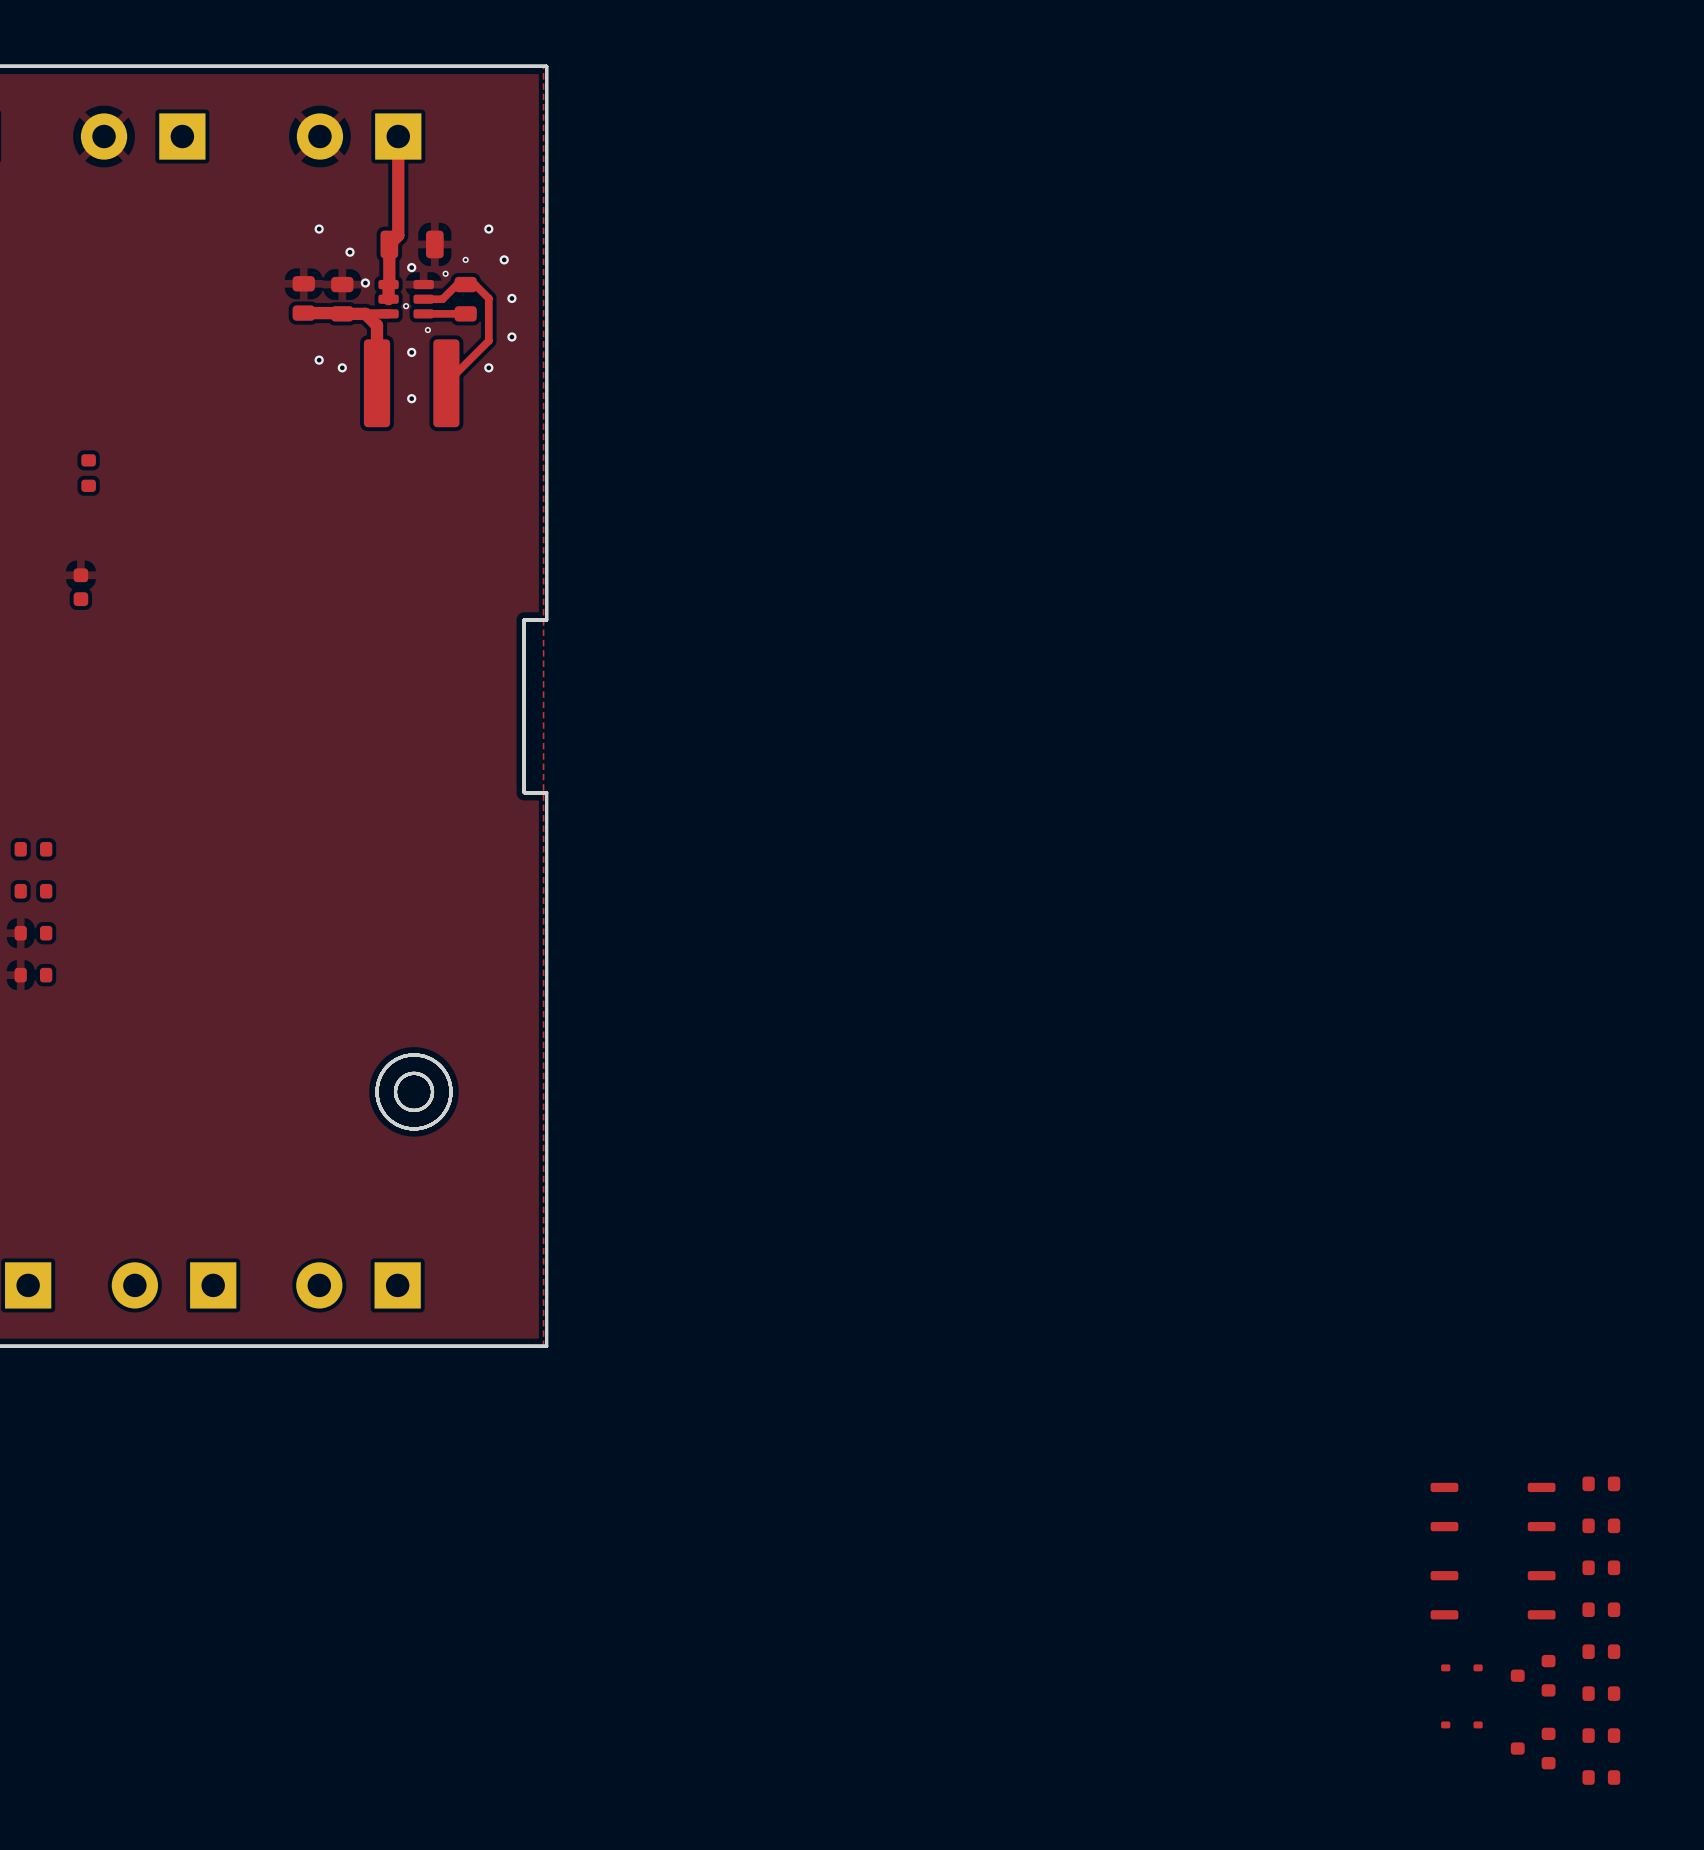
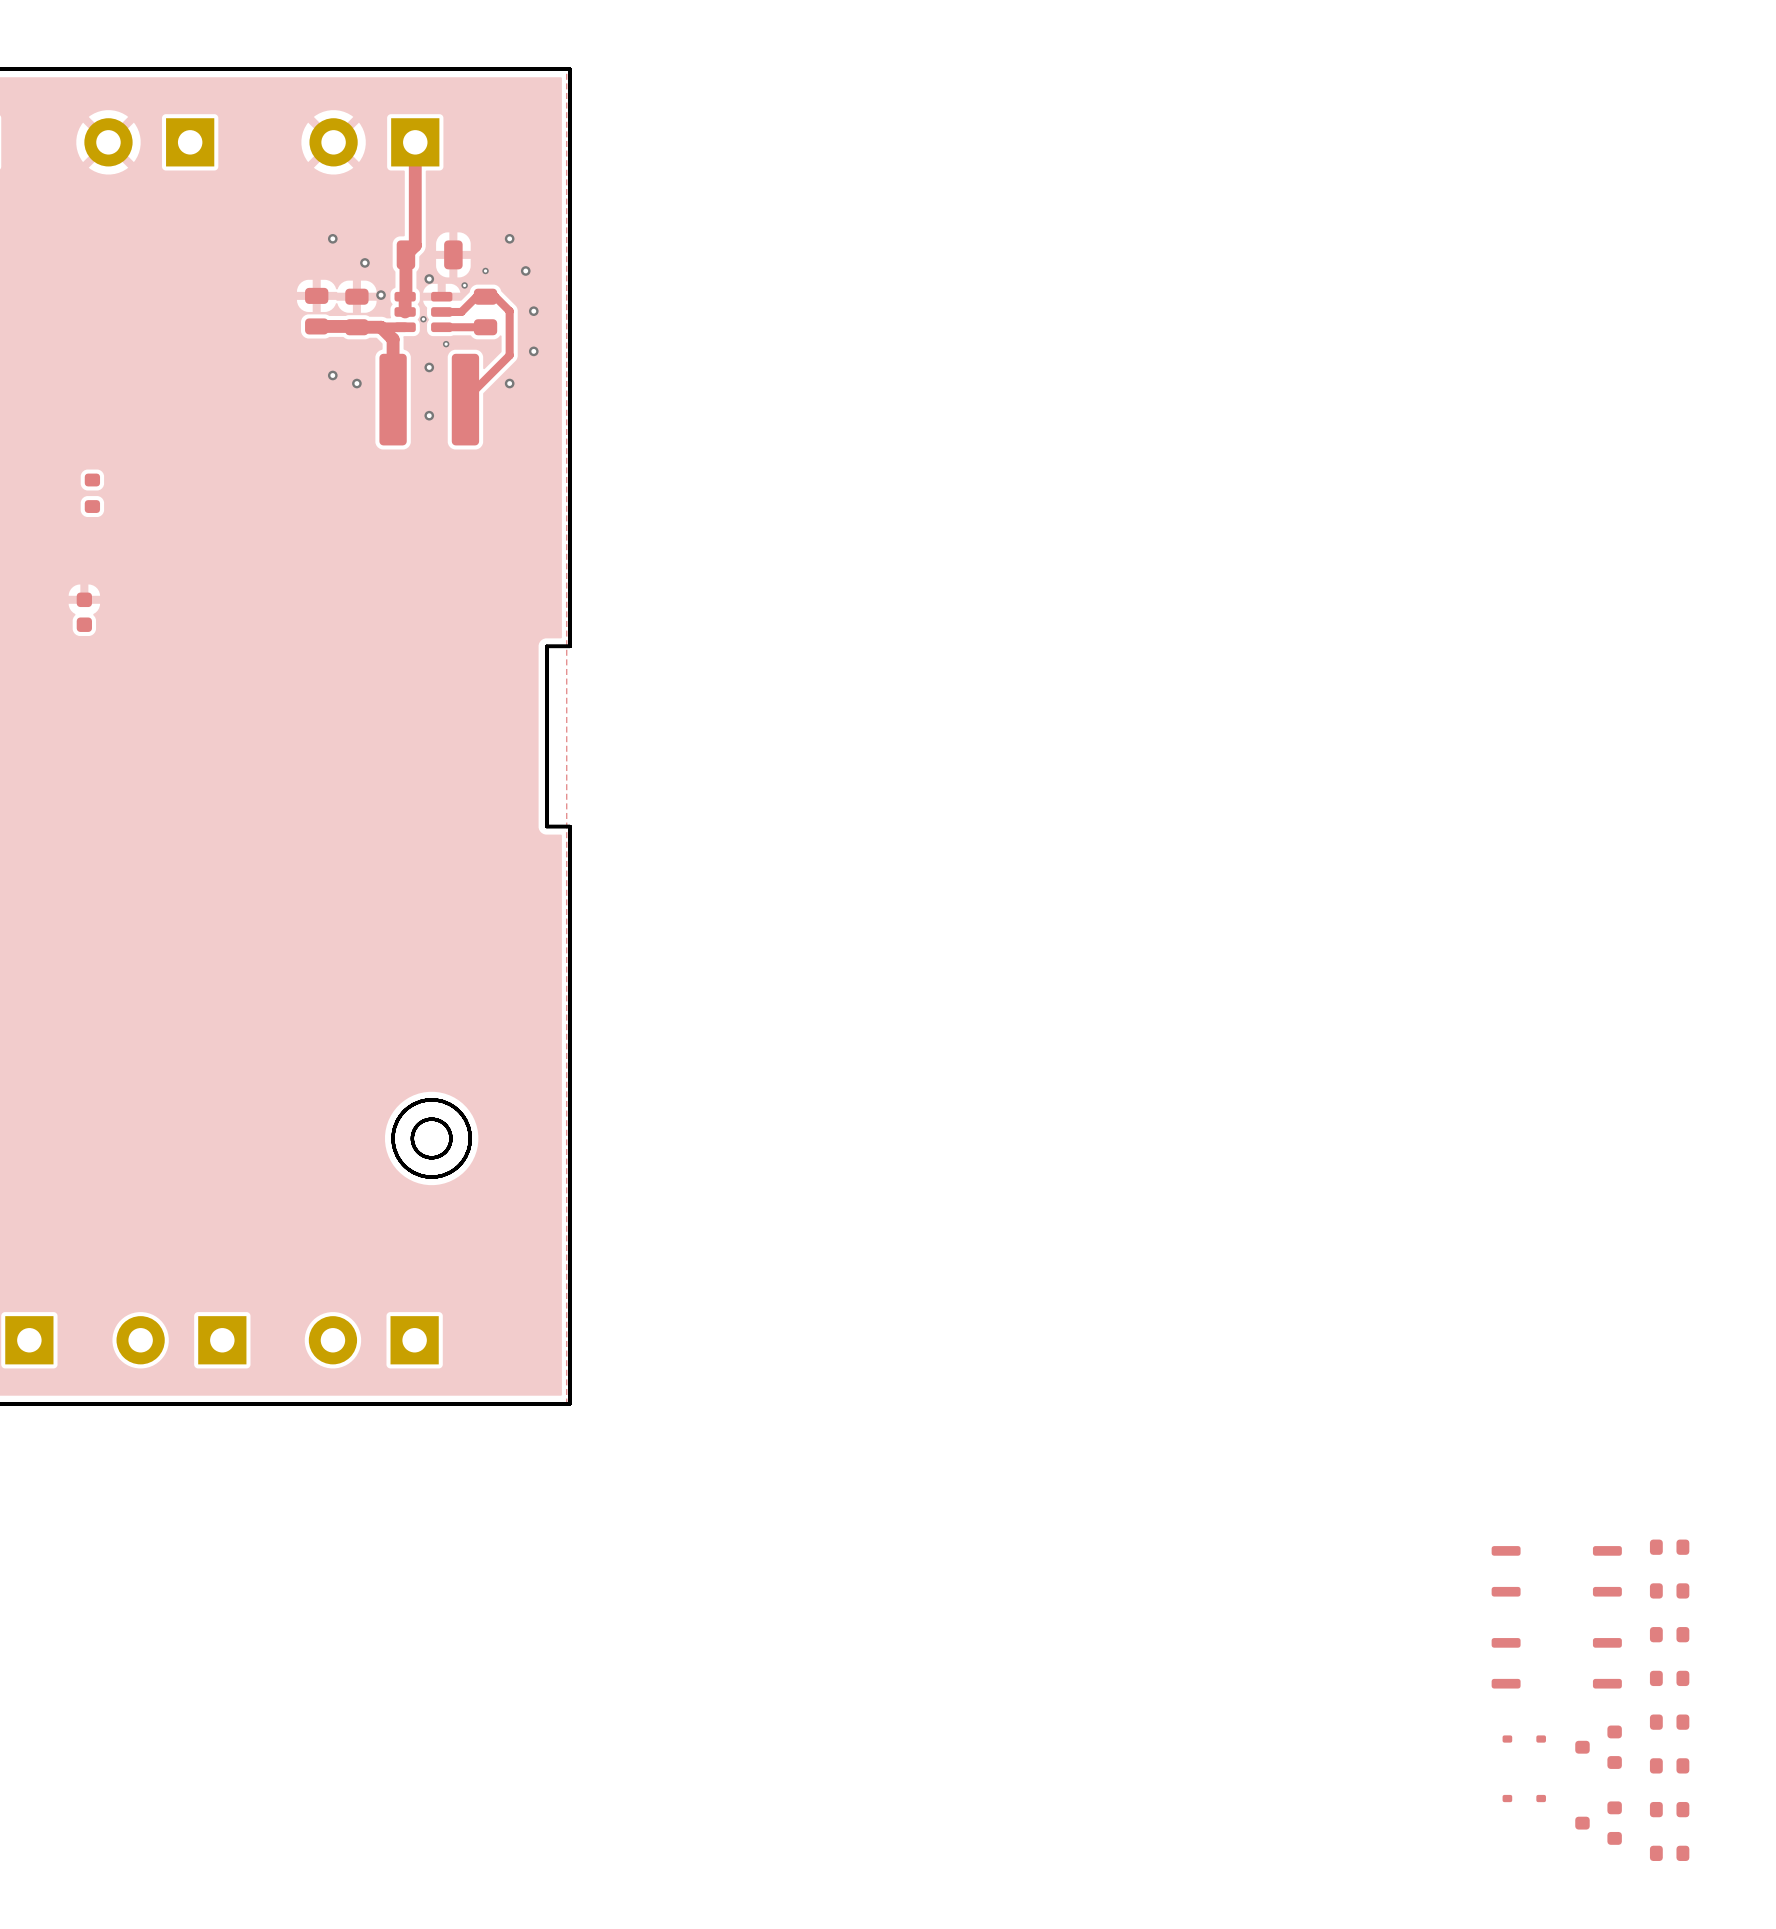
part: (33, 849) -> none
part: (33, 891) -> none
part: (33, 933) -> none
part: (33, 975) -> none

